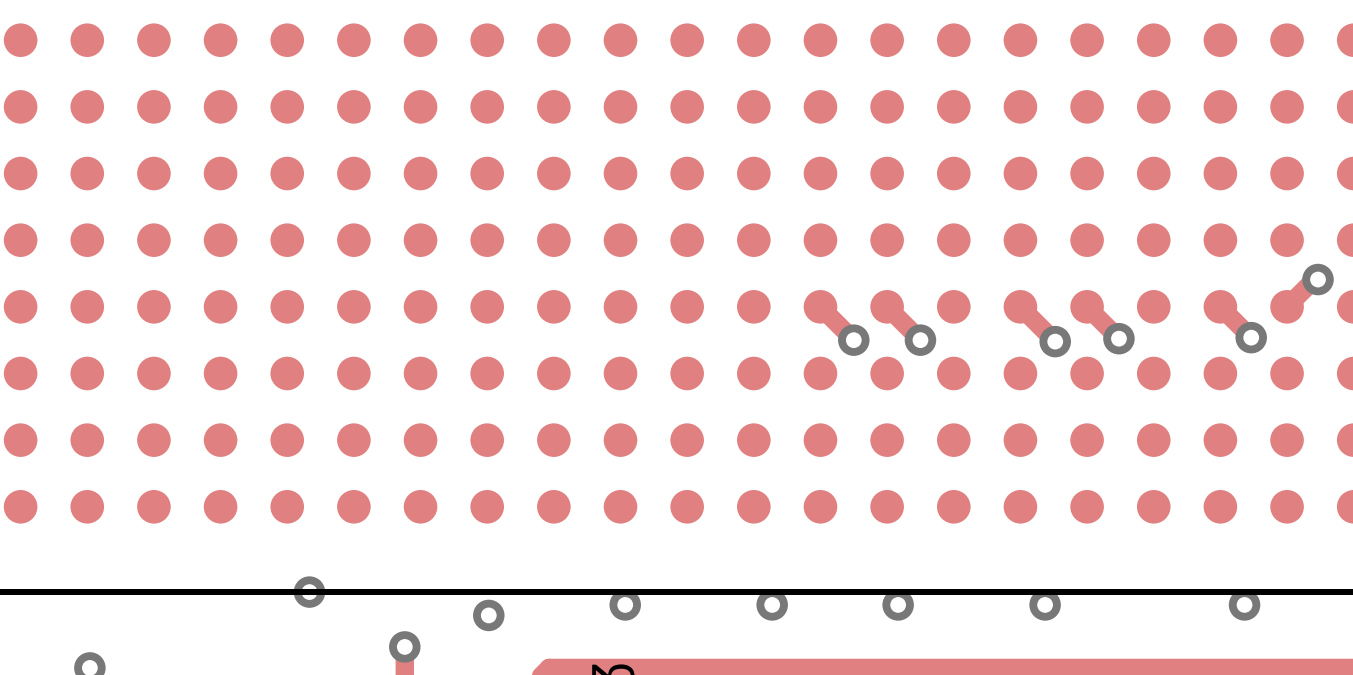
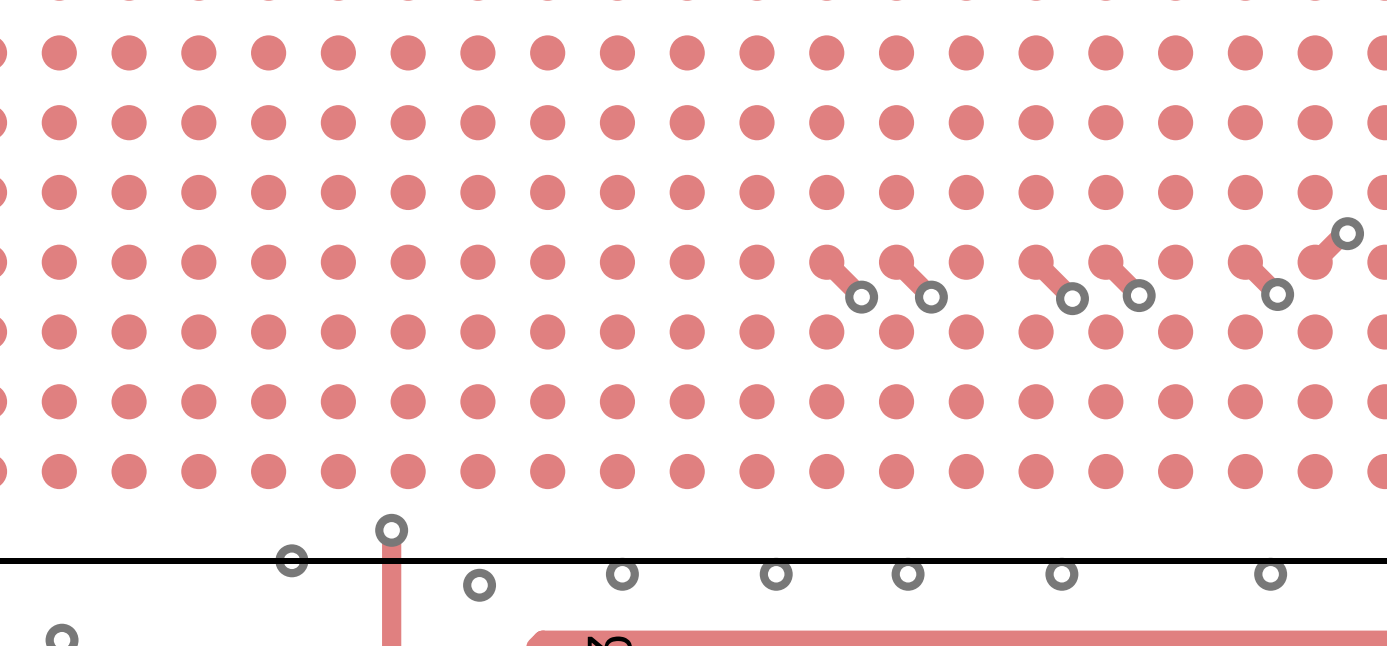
track: none -> (391, 530) (391, 618)
via position: (404, 646) -> (391, 530)

